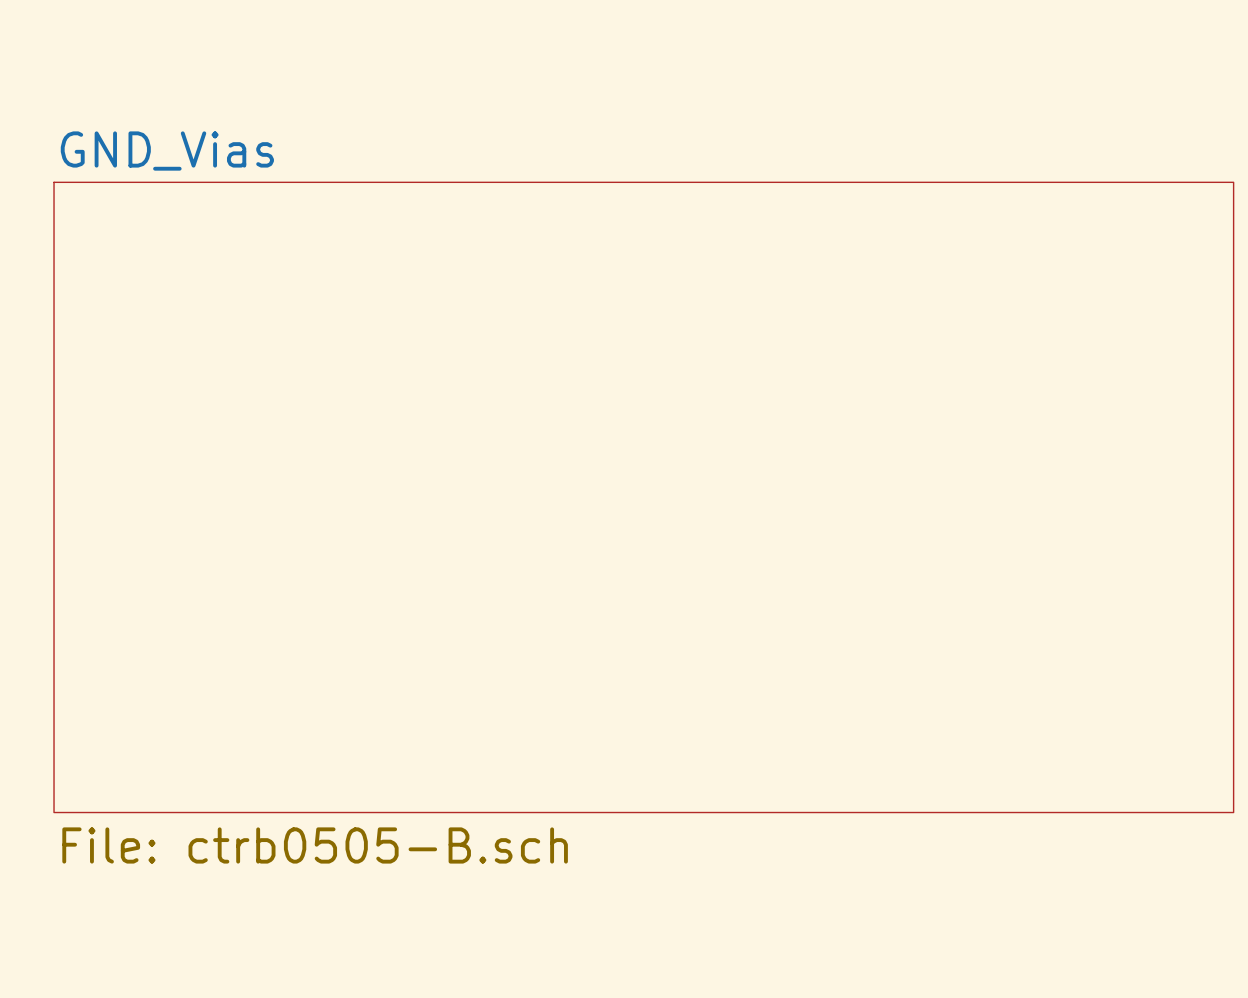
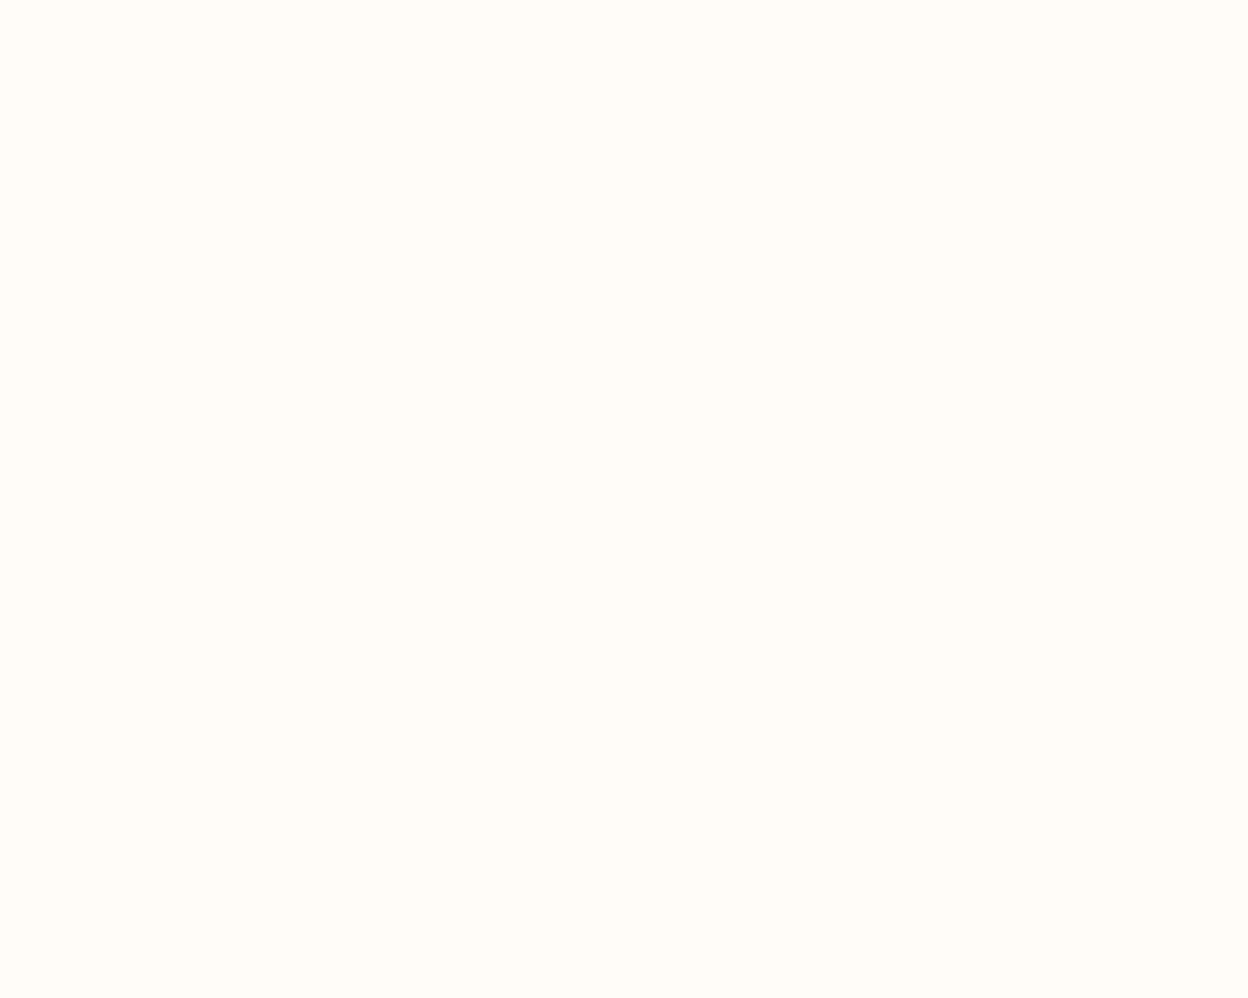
sheet GND_Vias: File: ctrb0505-B.sch (643, 497) -> none

